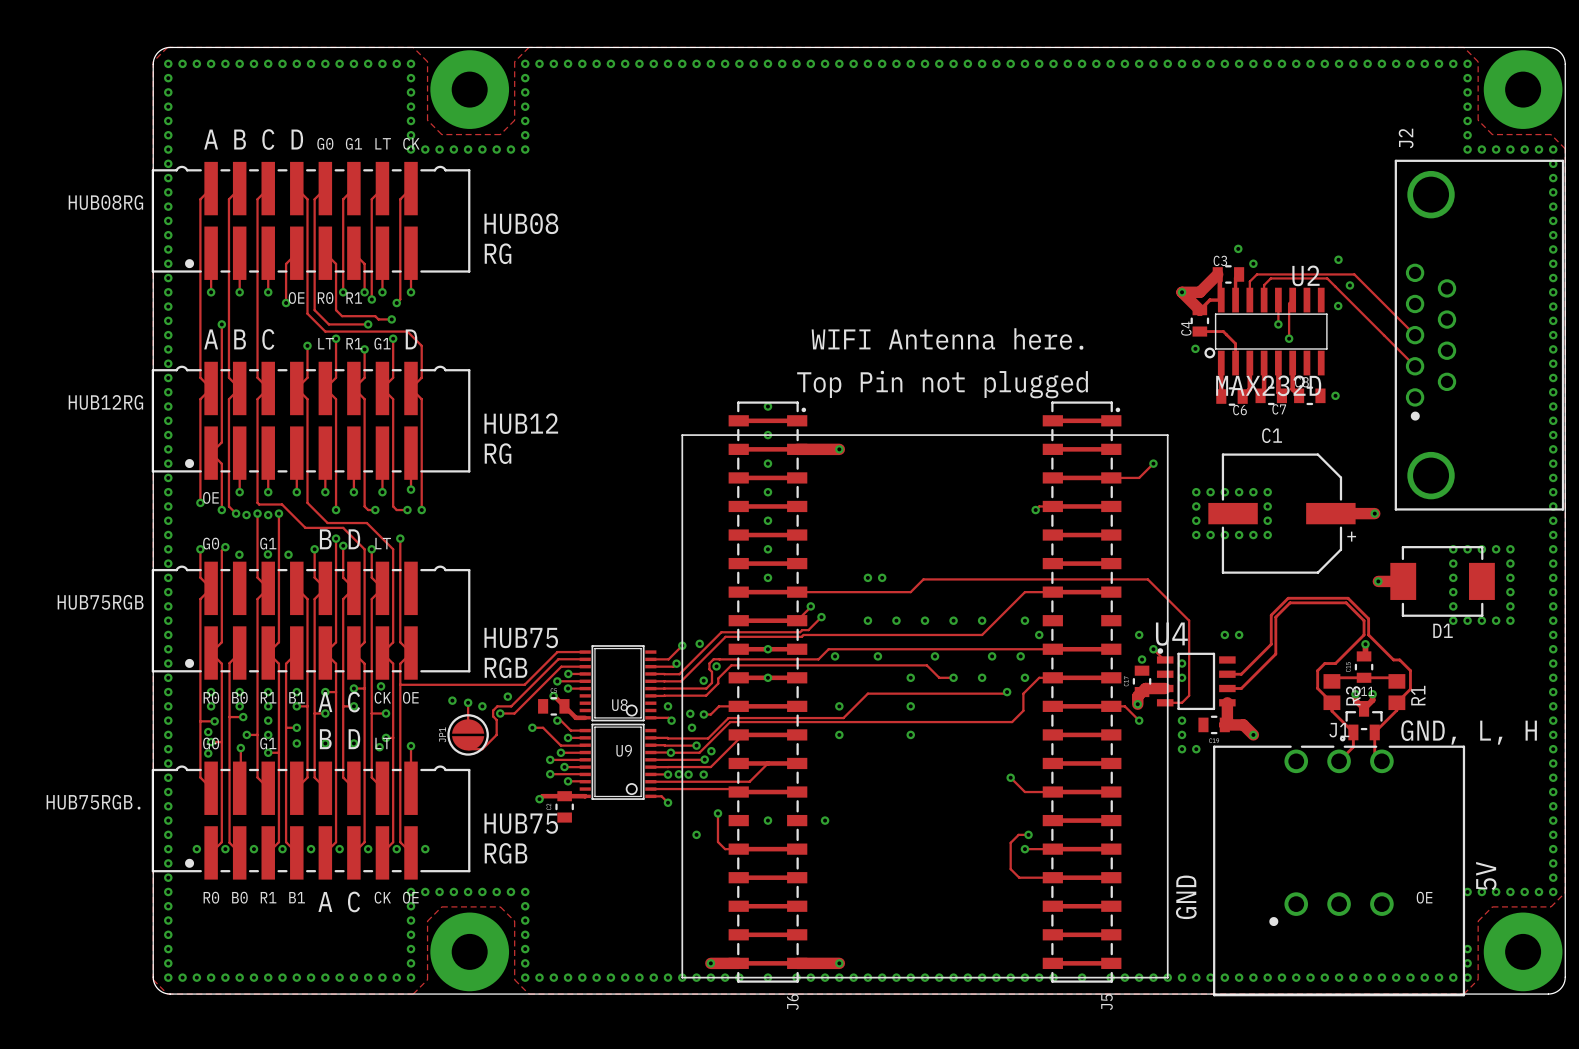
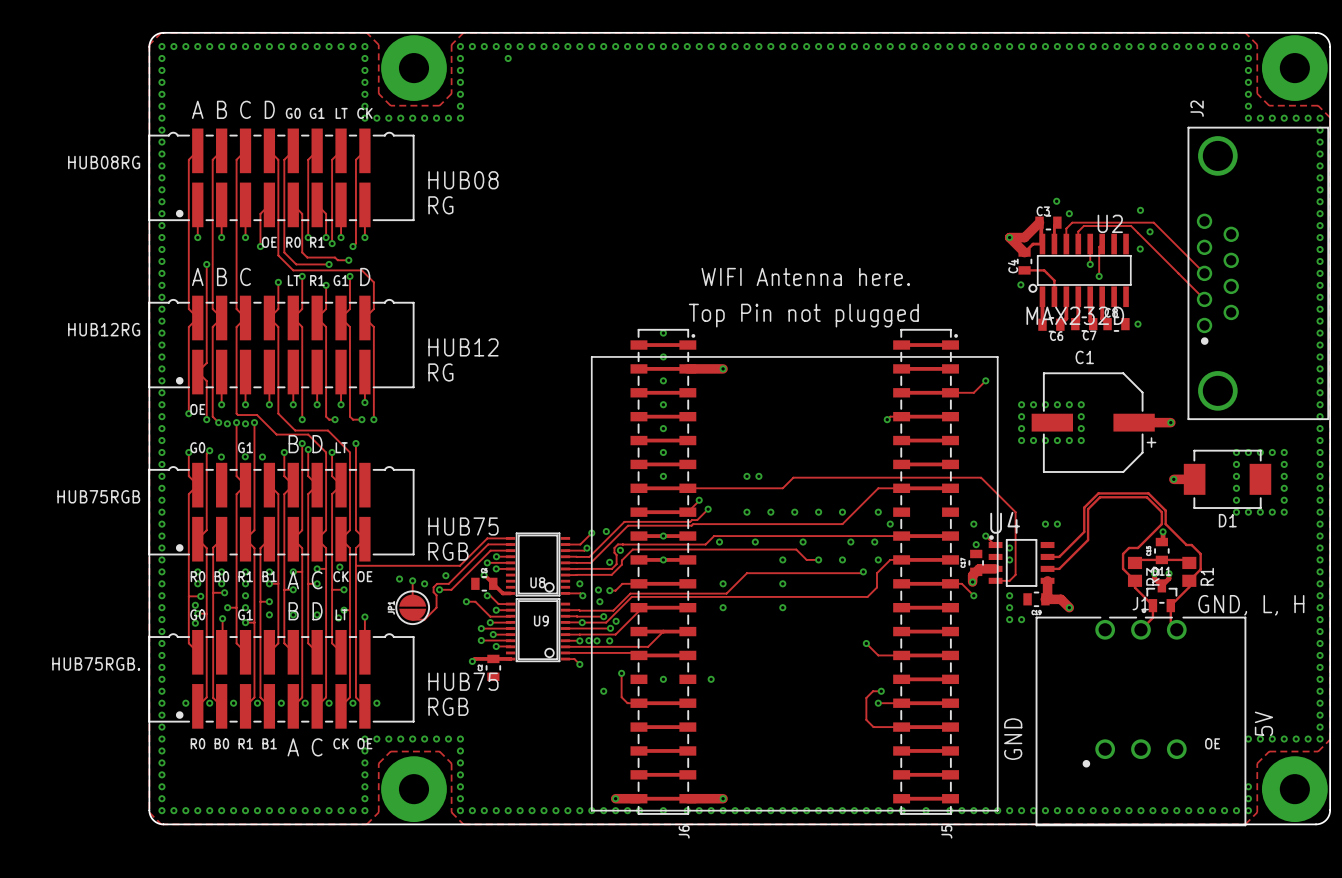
via: none -> (508, 58)

